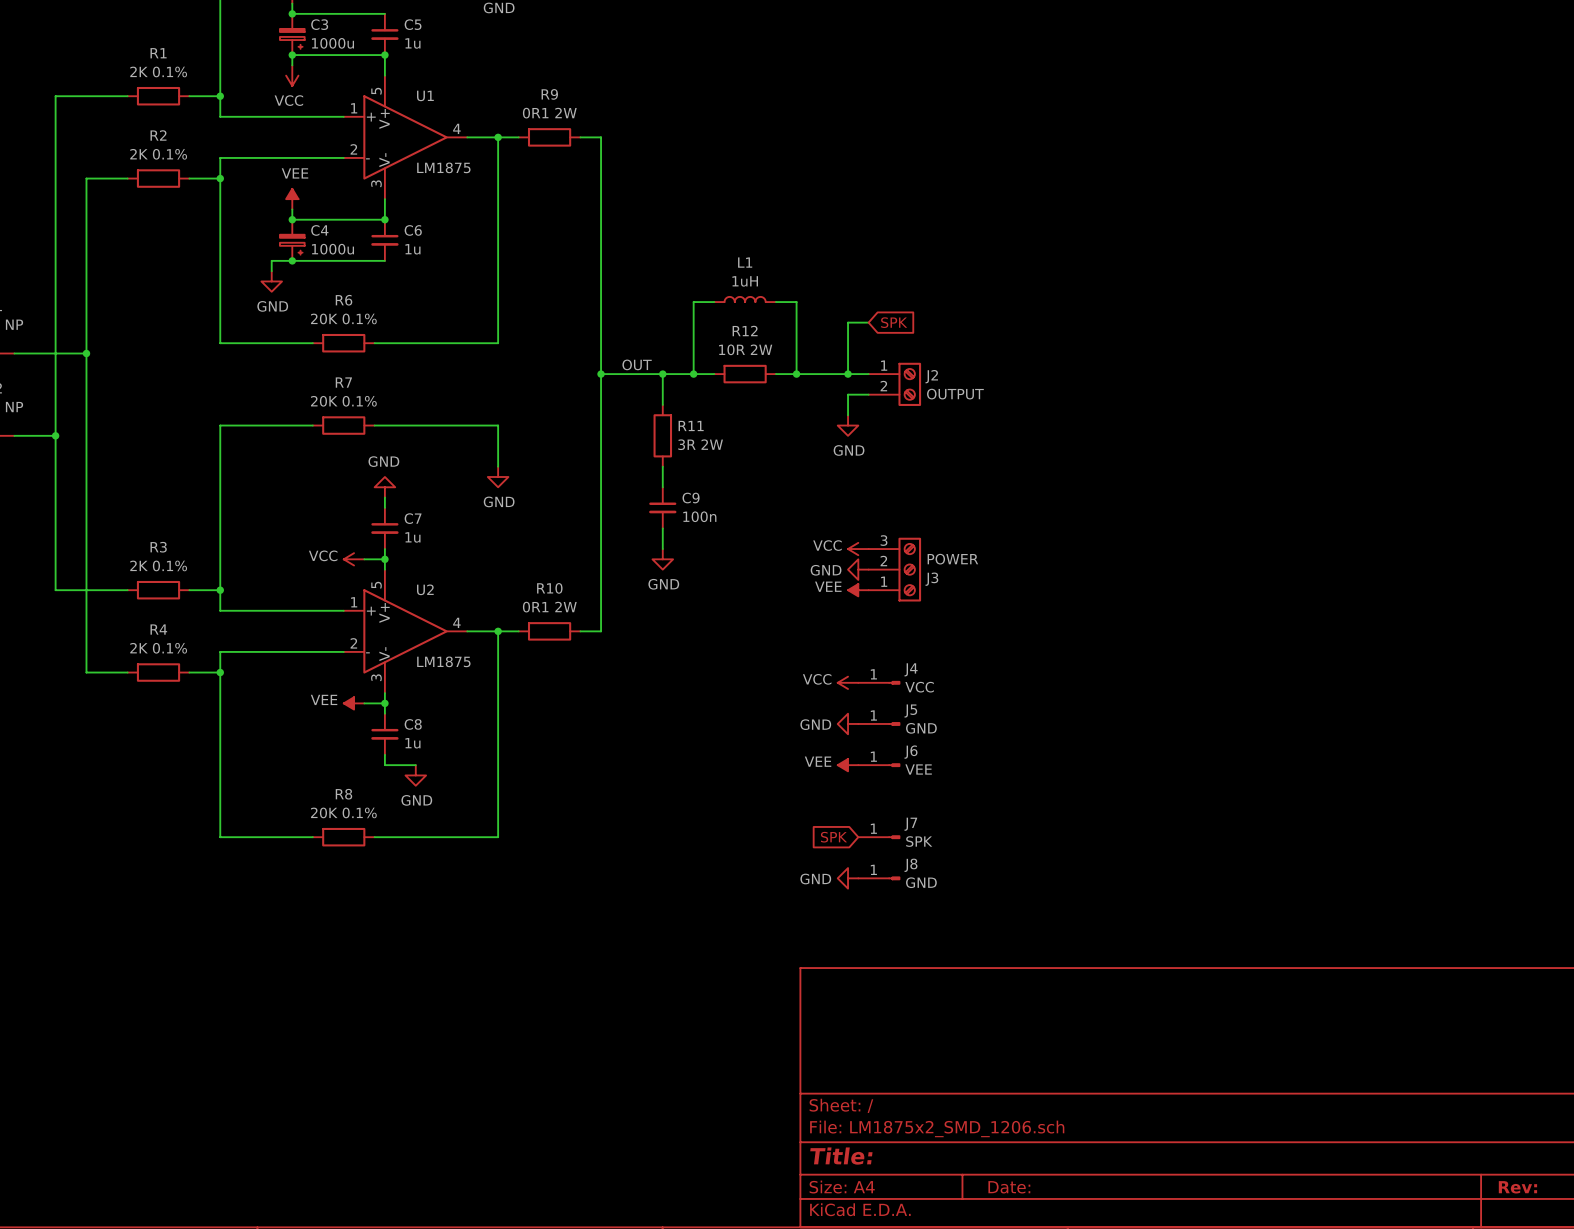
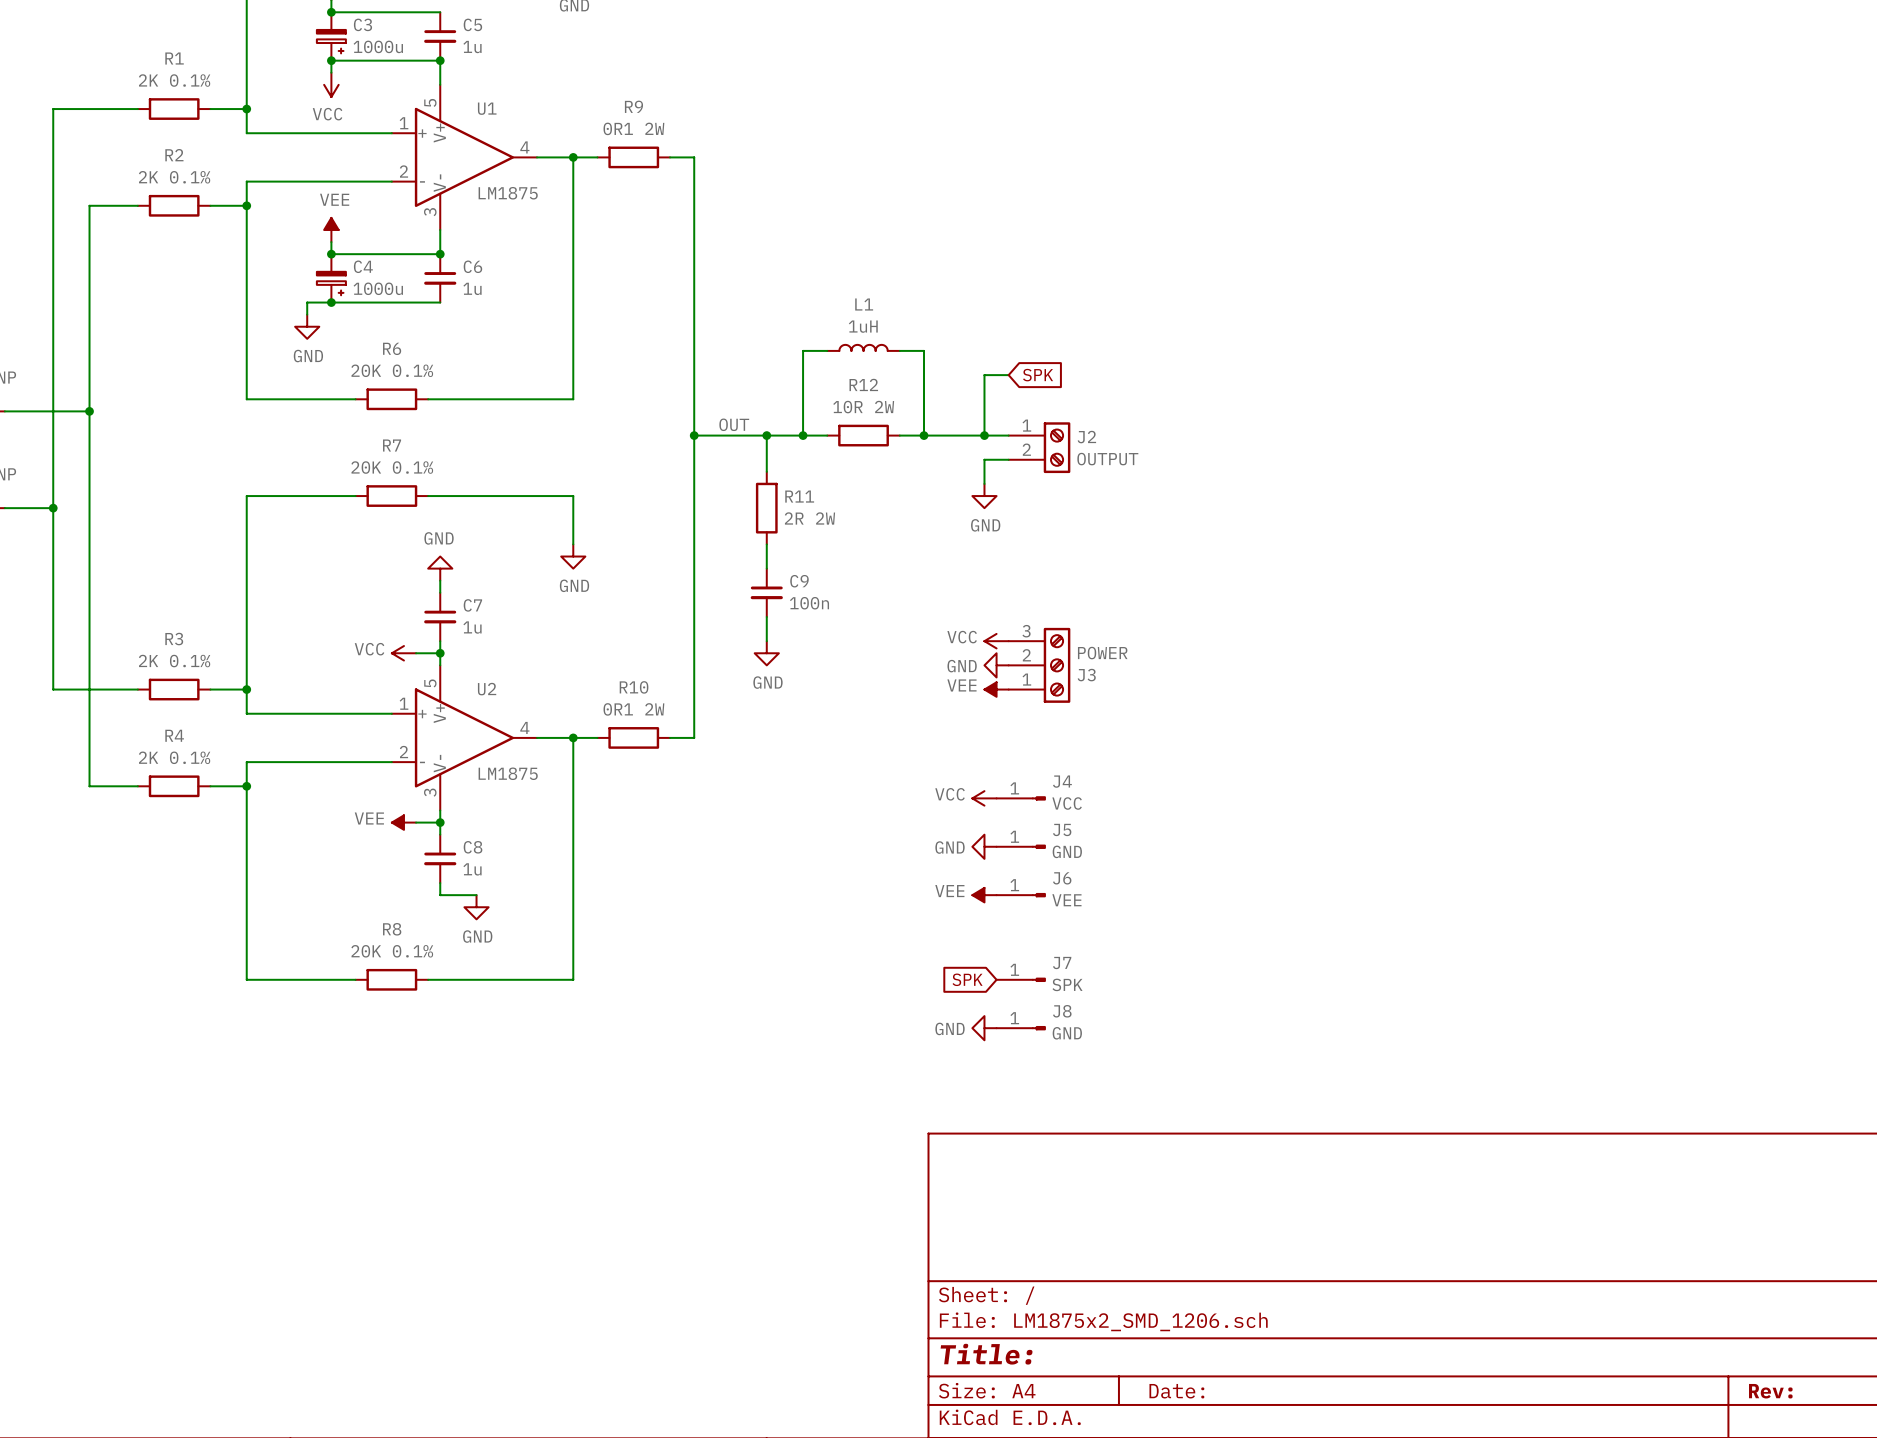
R11 value: 3R 2W (700, 444) -> 2R 2W (809, 518)

